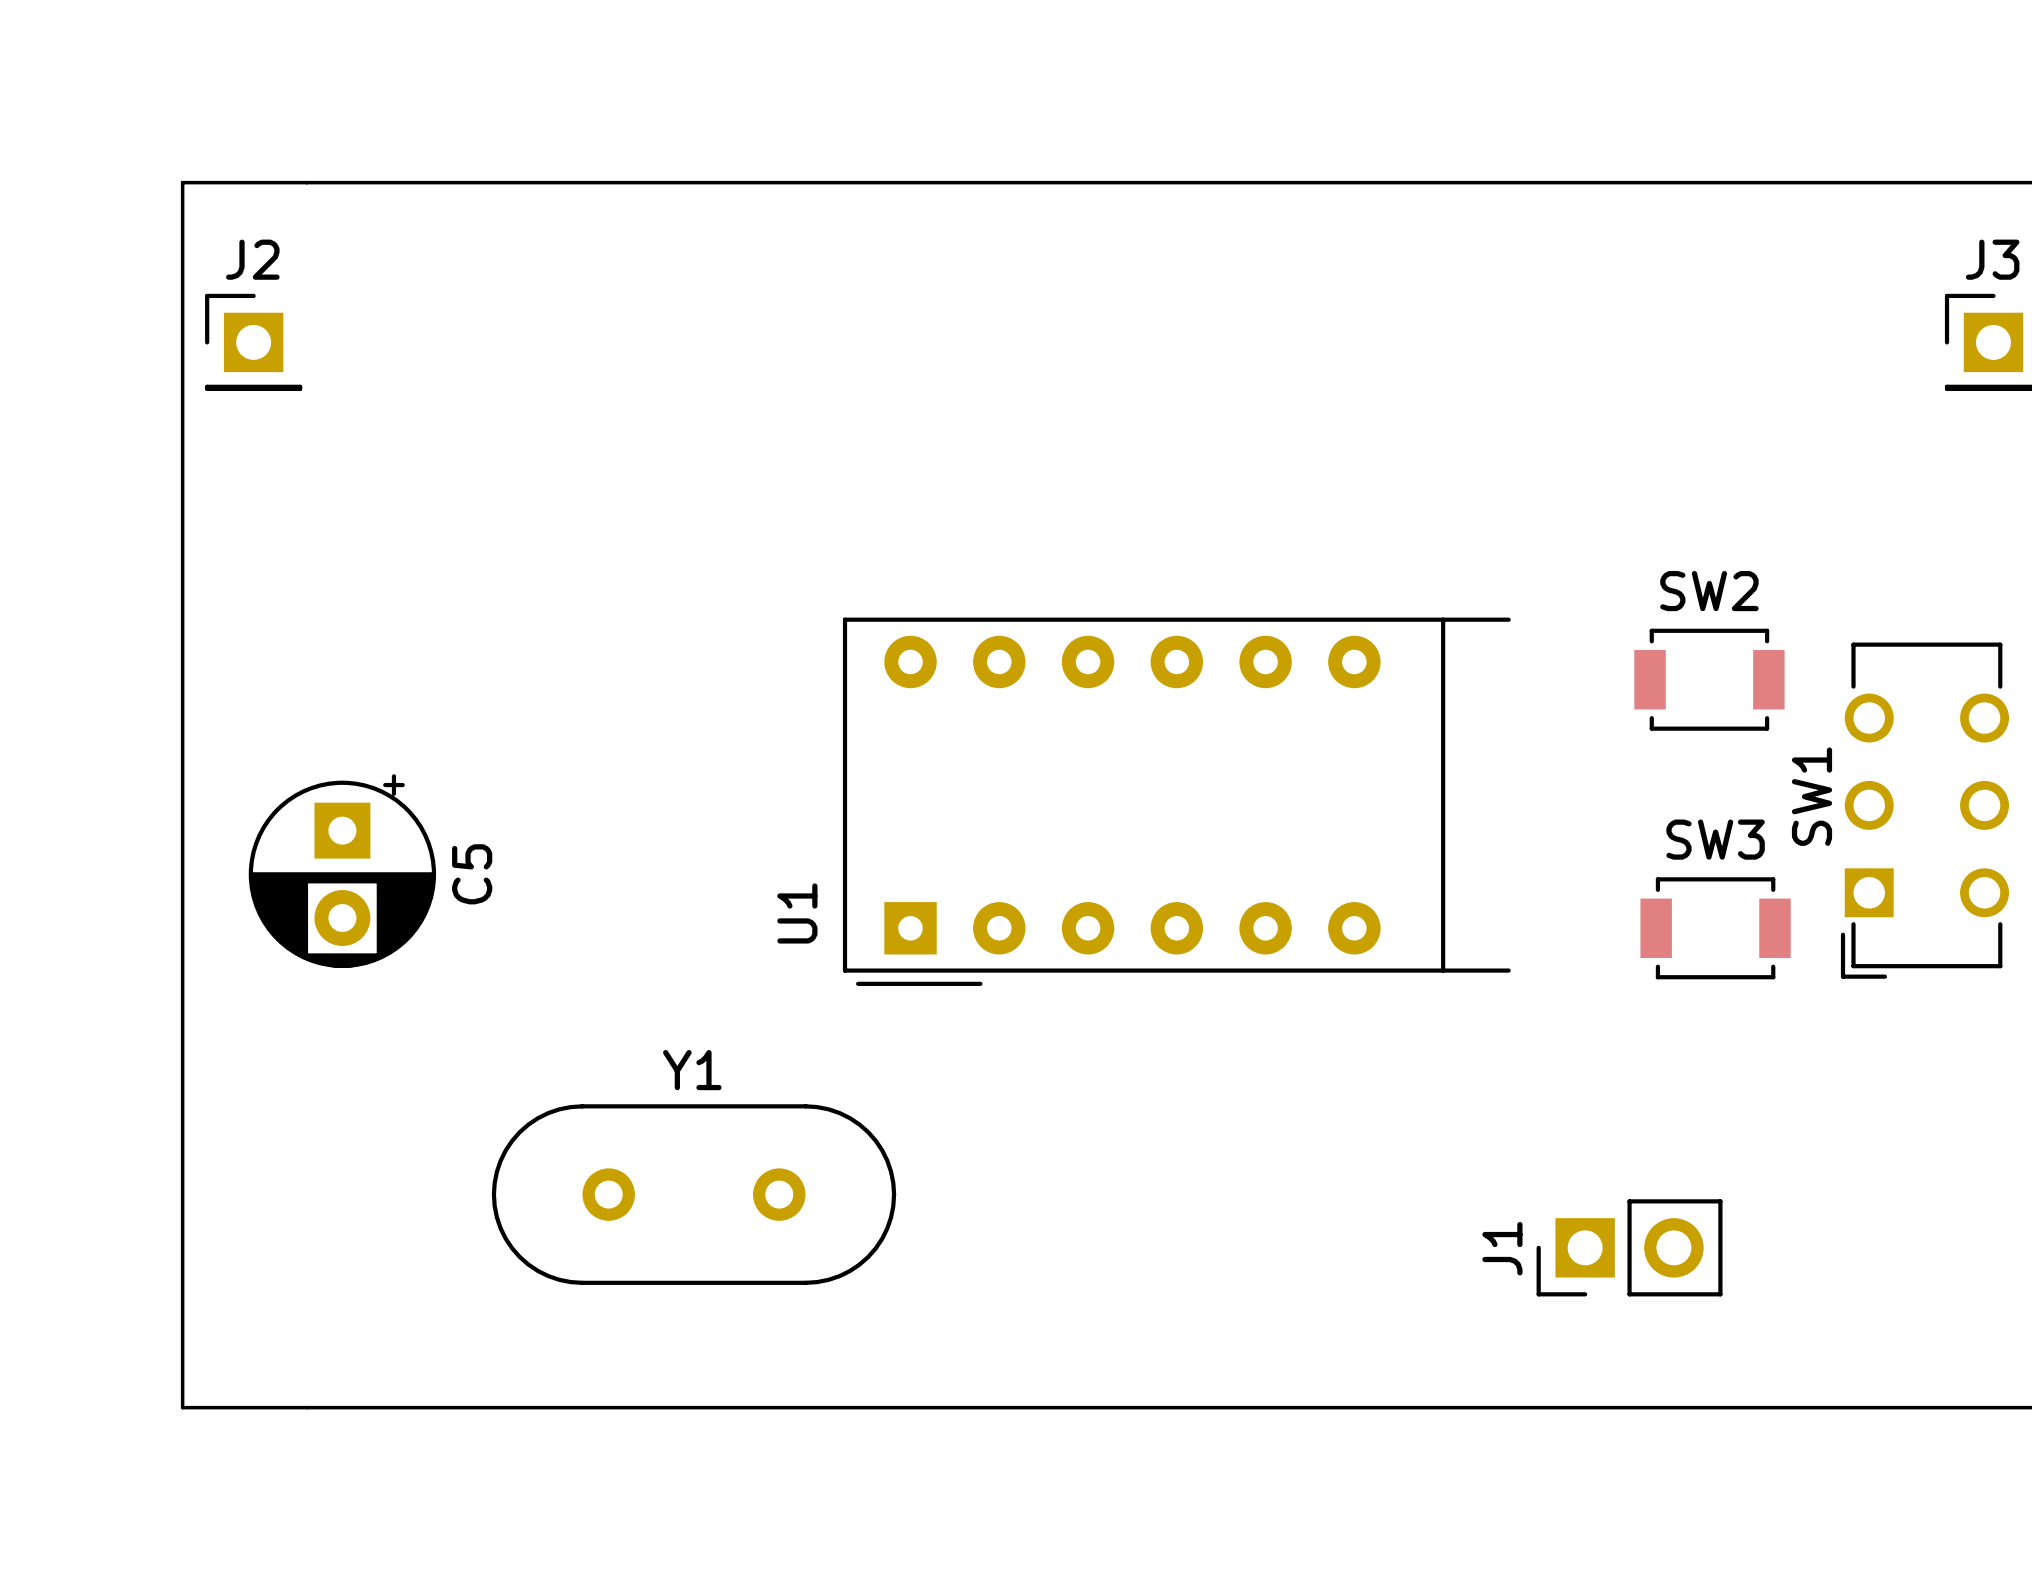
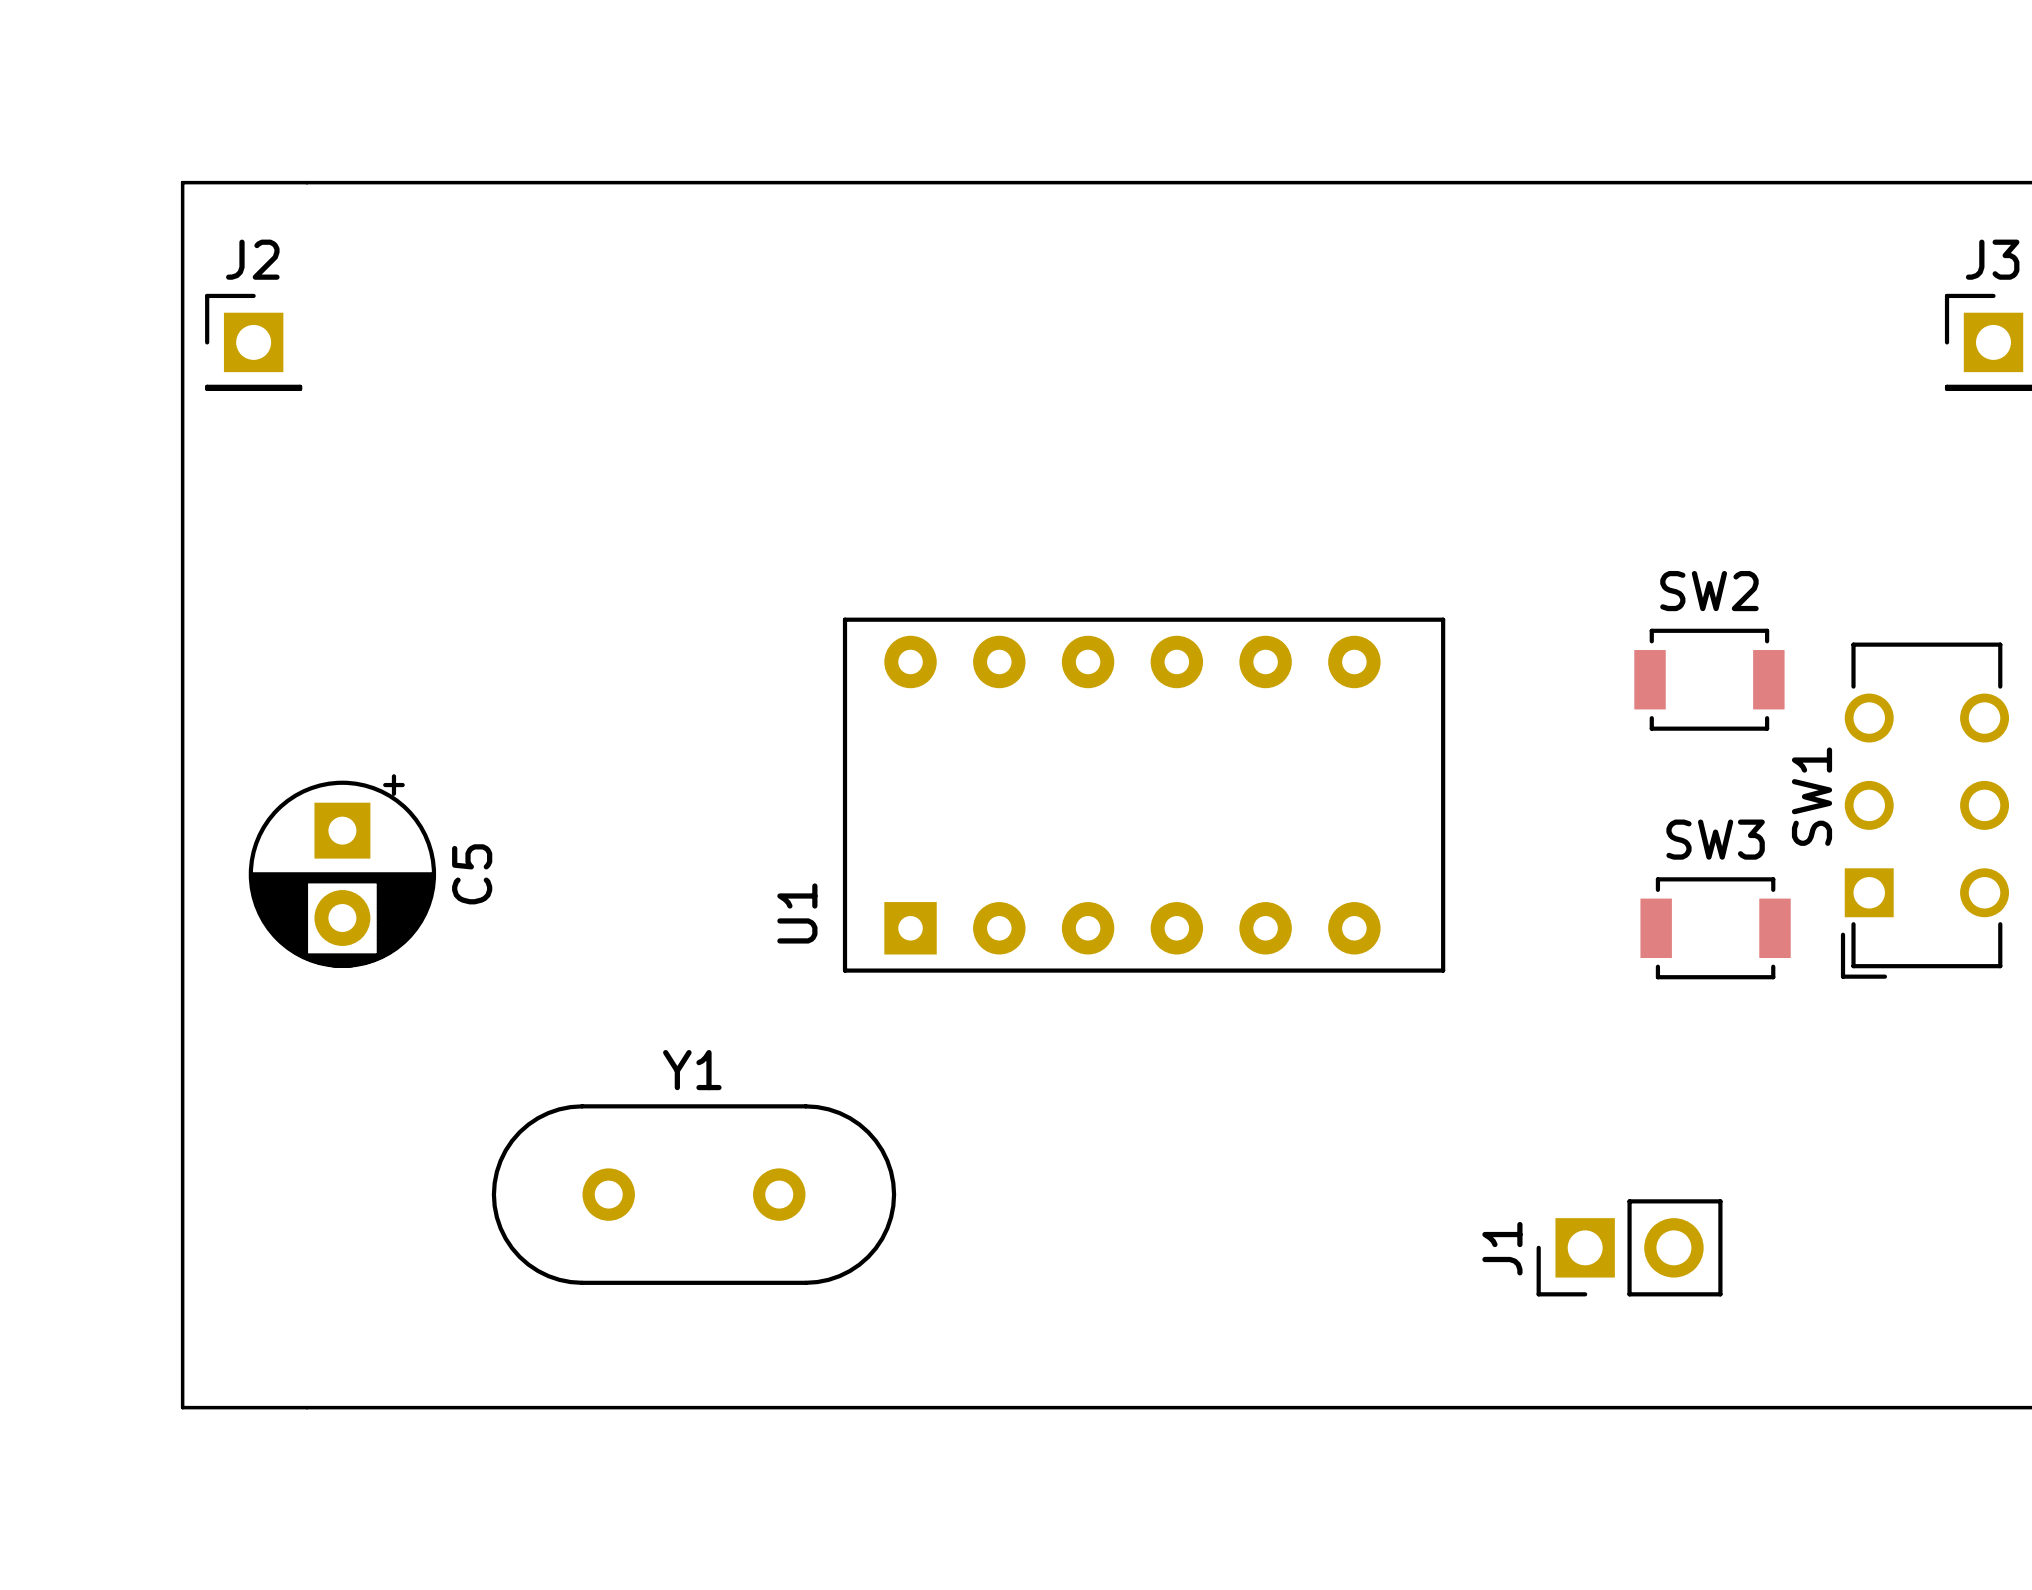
U1 footprint: [842, 617, 1511, 986] -> [842, 617, 1446, 973]

